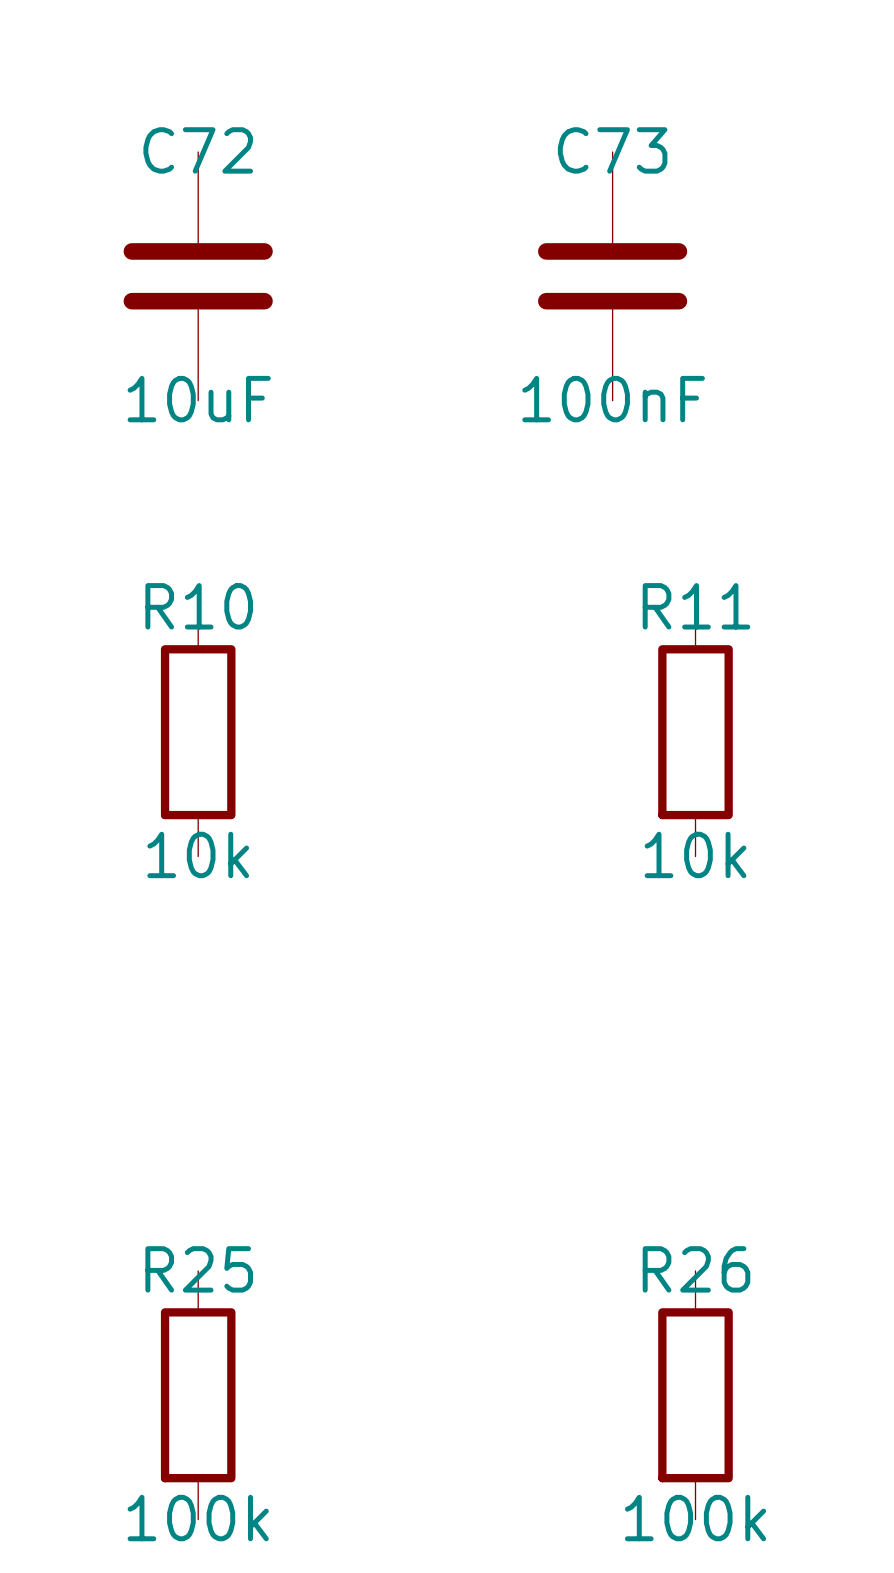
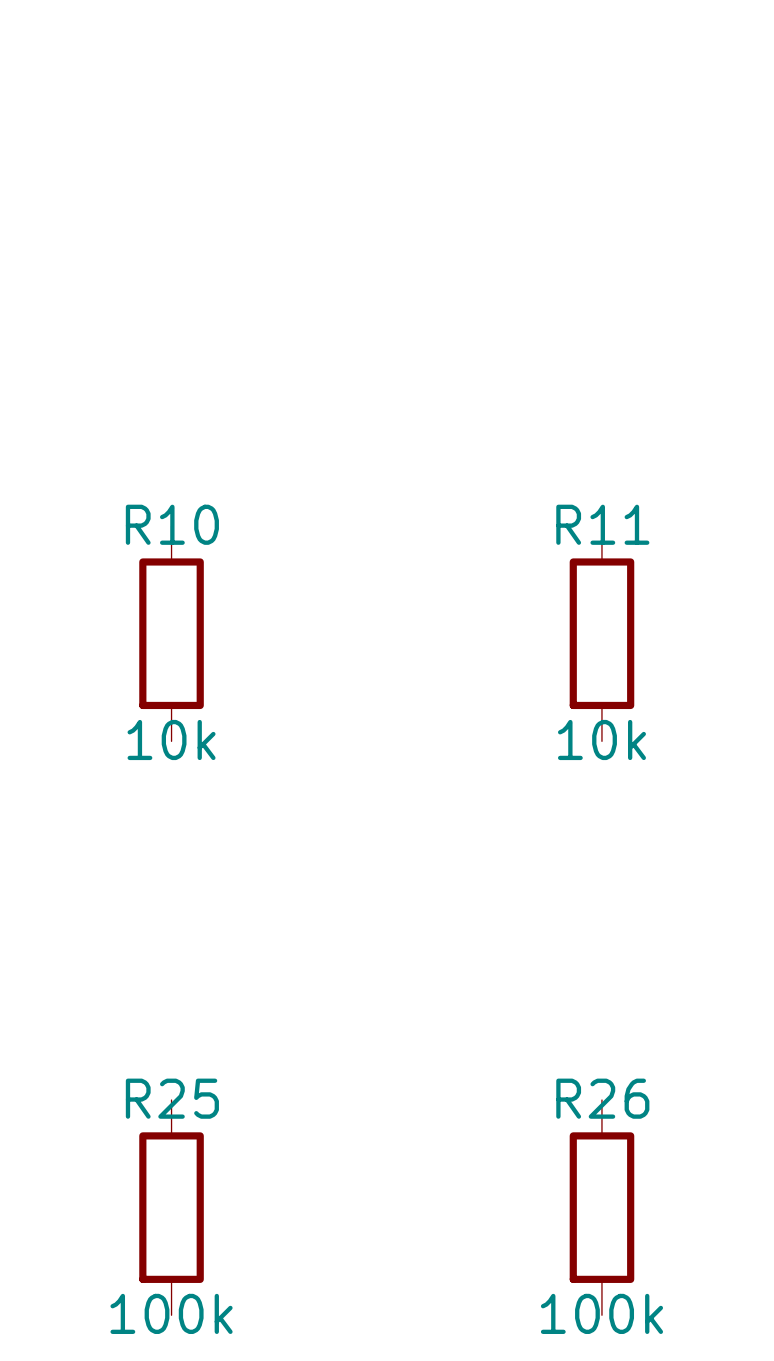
C72: 10uF (198, 276) -> none
C73: 100nF (612, 276) -> none

